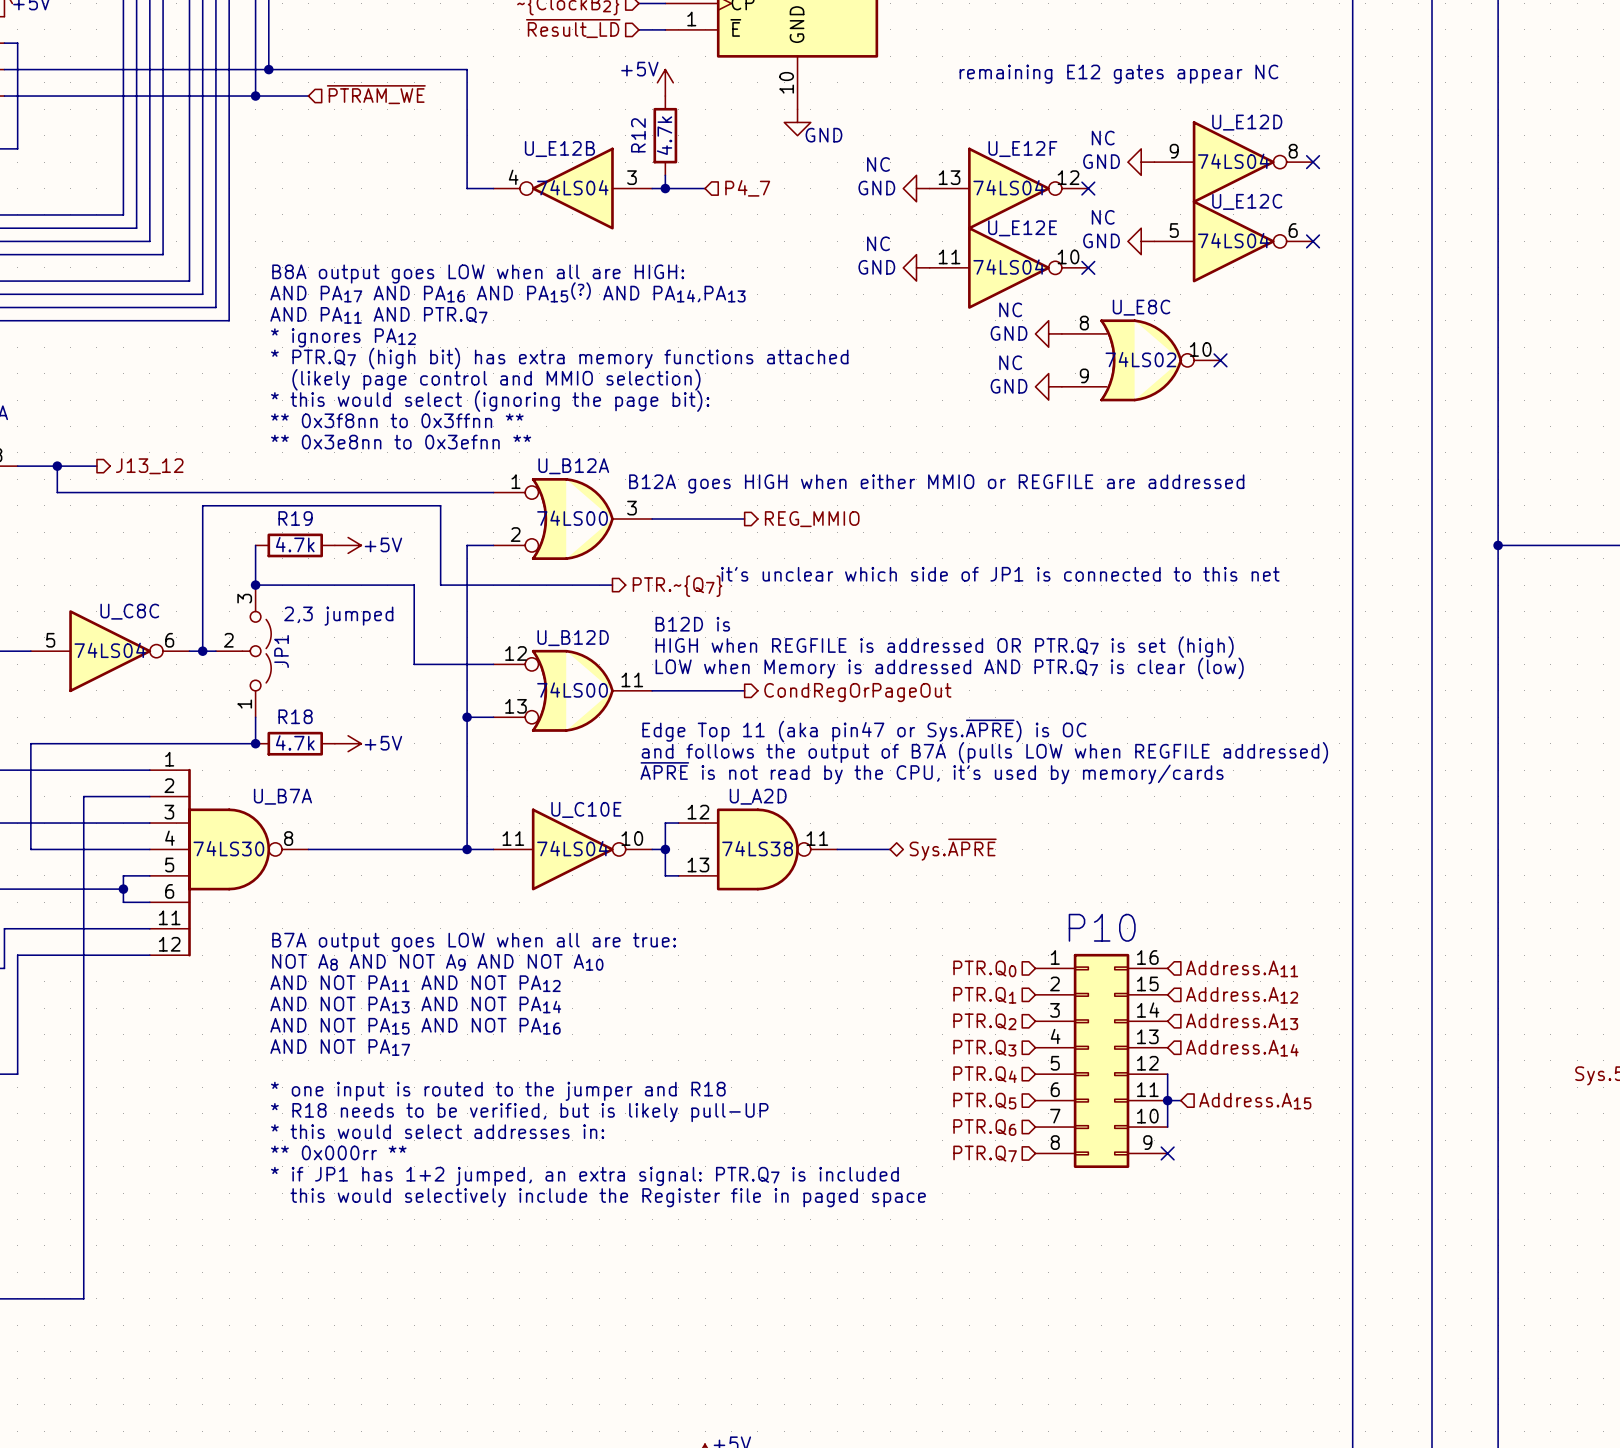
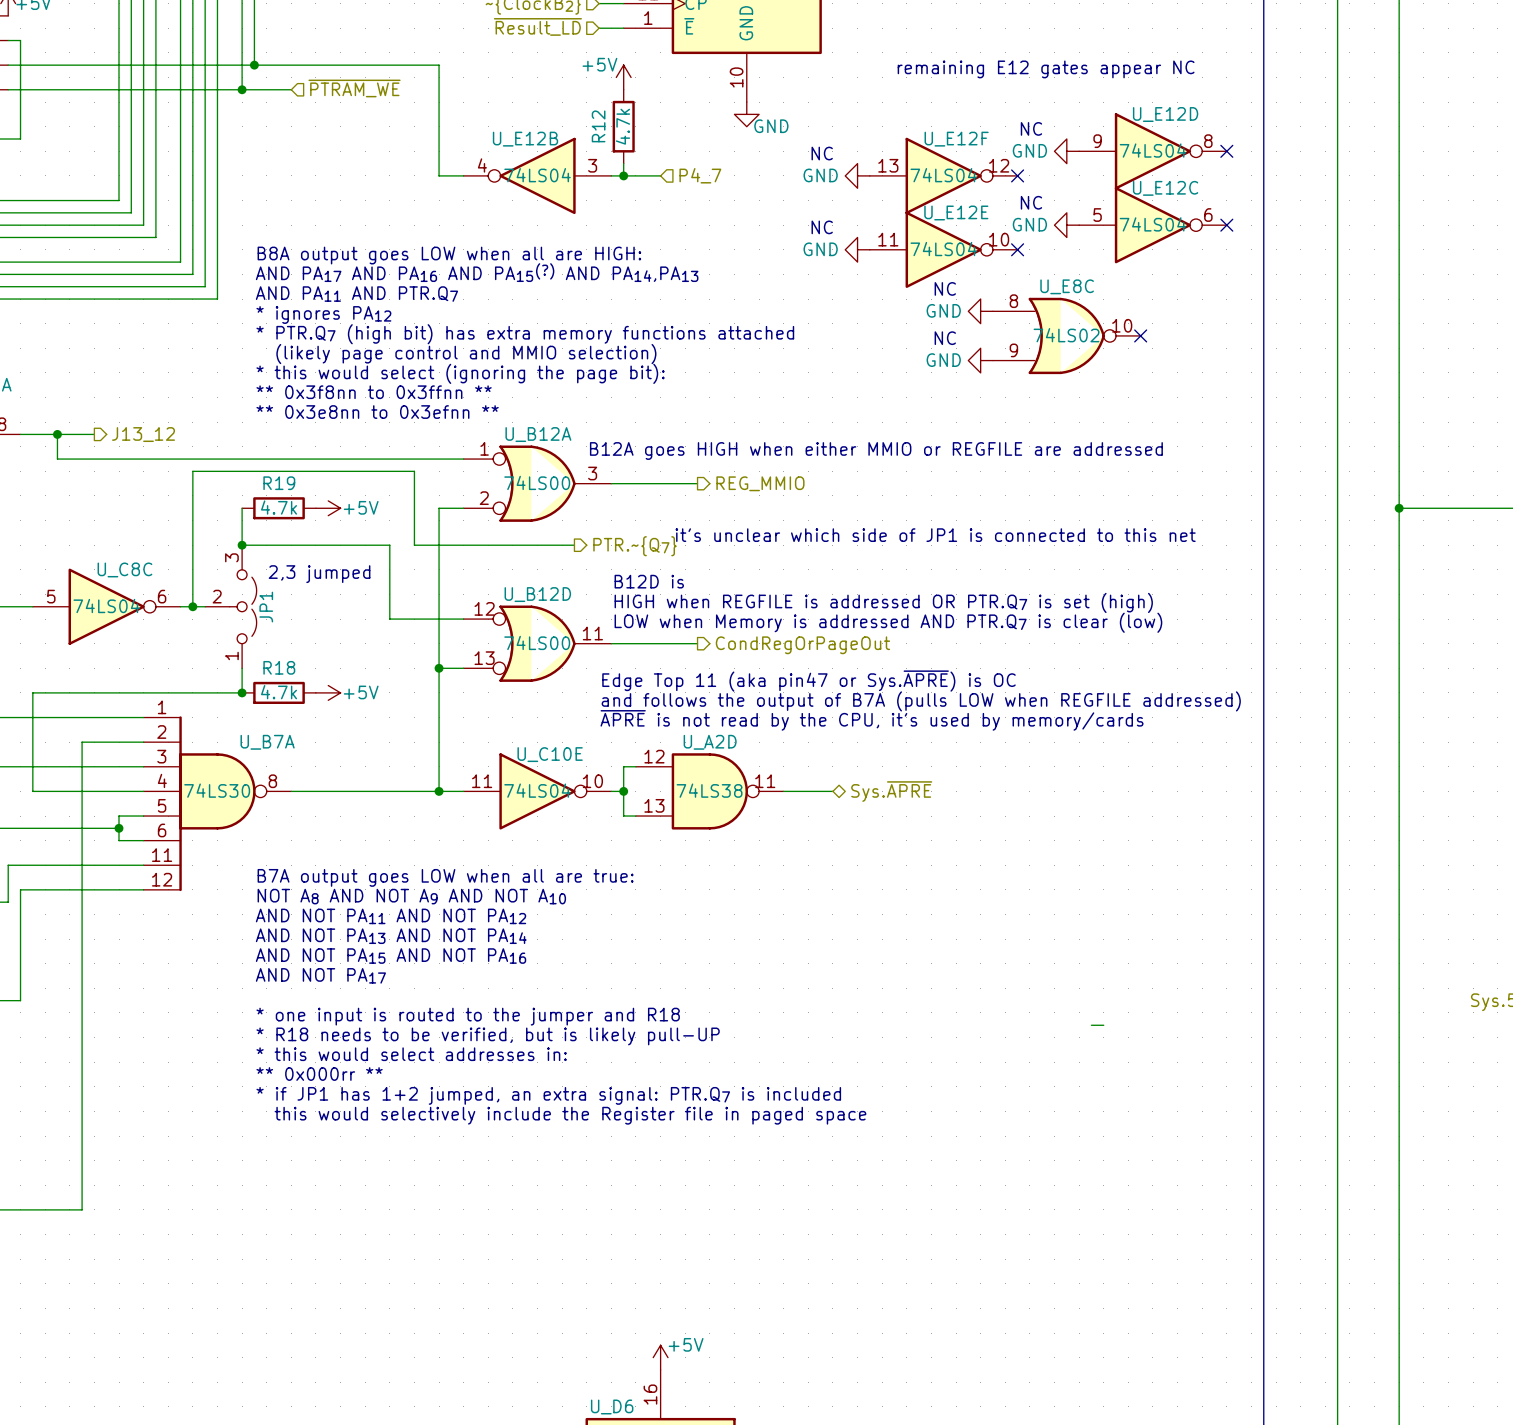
hierarchical label: PTR.Q0 (984, 968) -> none
hierarchical label: Address.A11 (1242, 968) -> none
hierarchical label: PTR.Q1 (984, 995) -> none
hierarchical label: Address.A12 (1242, 995) -> none
hierarchical label: PTR.Q2 (984, 1021) -> none
hierarchical label: Address.A13 (1242, 1021) -> none
hierarchical label: PTR.Q3 (984, 1048) -> none
hierarchical label: Address.A14 (1242, 1048) -> none
P10: (1101, 1060) -> none
hierarchical label: PTR.Q4 (985, 1074) -> none
wire: (1167, 1074) (1167, 1127) -> none
junction: (1167, 1100) -> none
hierarchical label: PTR.Q5 (984, 1101) -> none
hierarchical label: Address.A15 (1255, 1101) -> none
hierarchical label: PTR.Q6 (984, 1127) -> none
hierarchical label: PTR.Q7 (985, 1153) -> none
no-connect mark: (1167, 1153) -> none

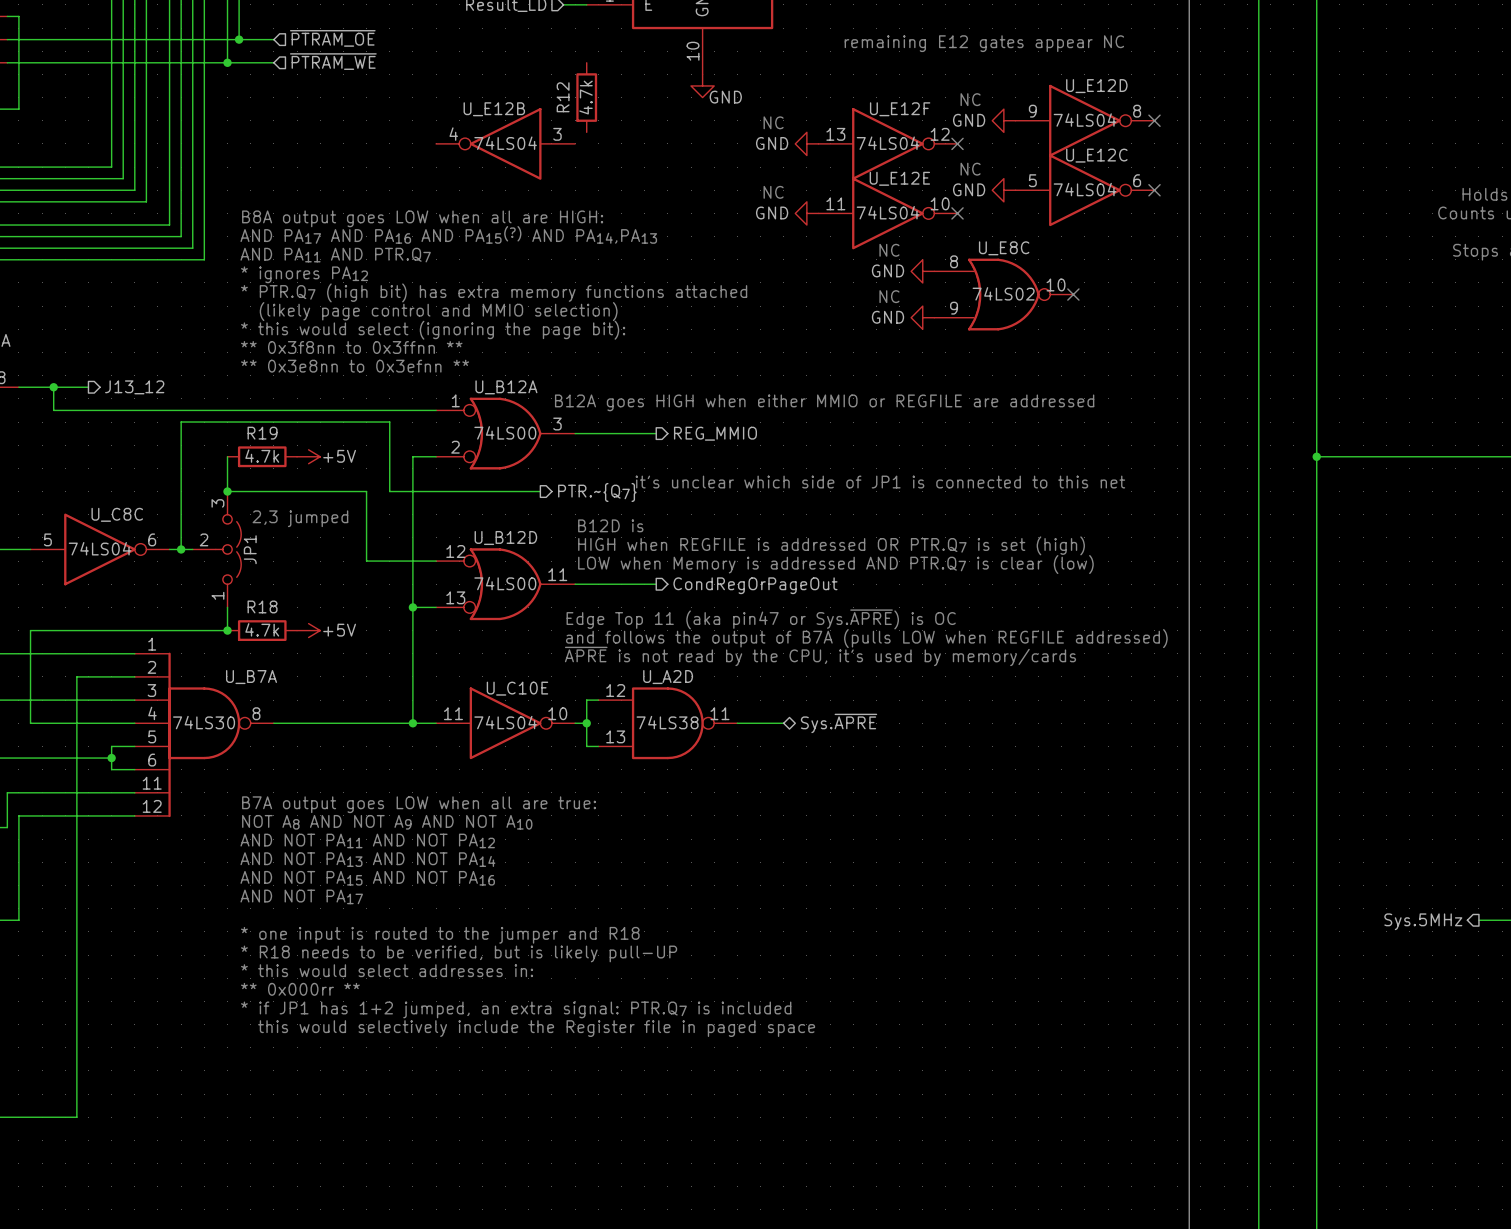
hierarchical label: none -> ~{PTRAM_OE} (332, 38)
wire: (291, 65) (439, 65) (439, 175) (463, 175) -> none
power symbol: +5V (623, 77) -> none
wire: (623, 163) (623, 175) -> none
wire: (611, 175) (660, 175) -> none
junction: (623, 175) -> none
hierarchical label: P4_7 (700, 175) -> none
wire: (1091, 1025) (1103, 1025) -> none

